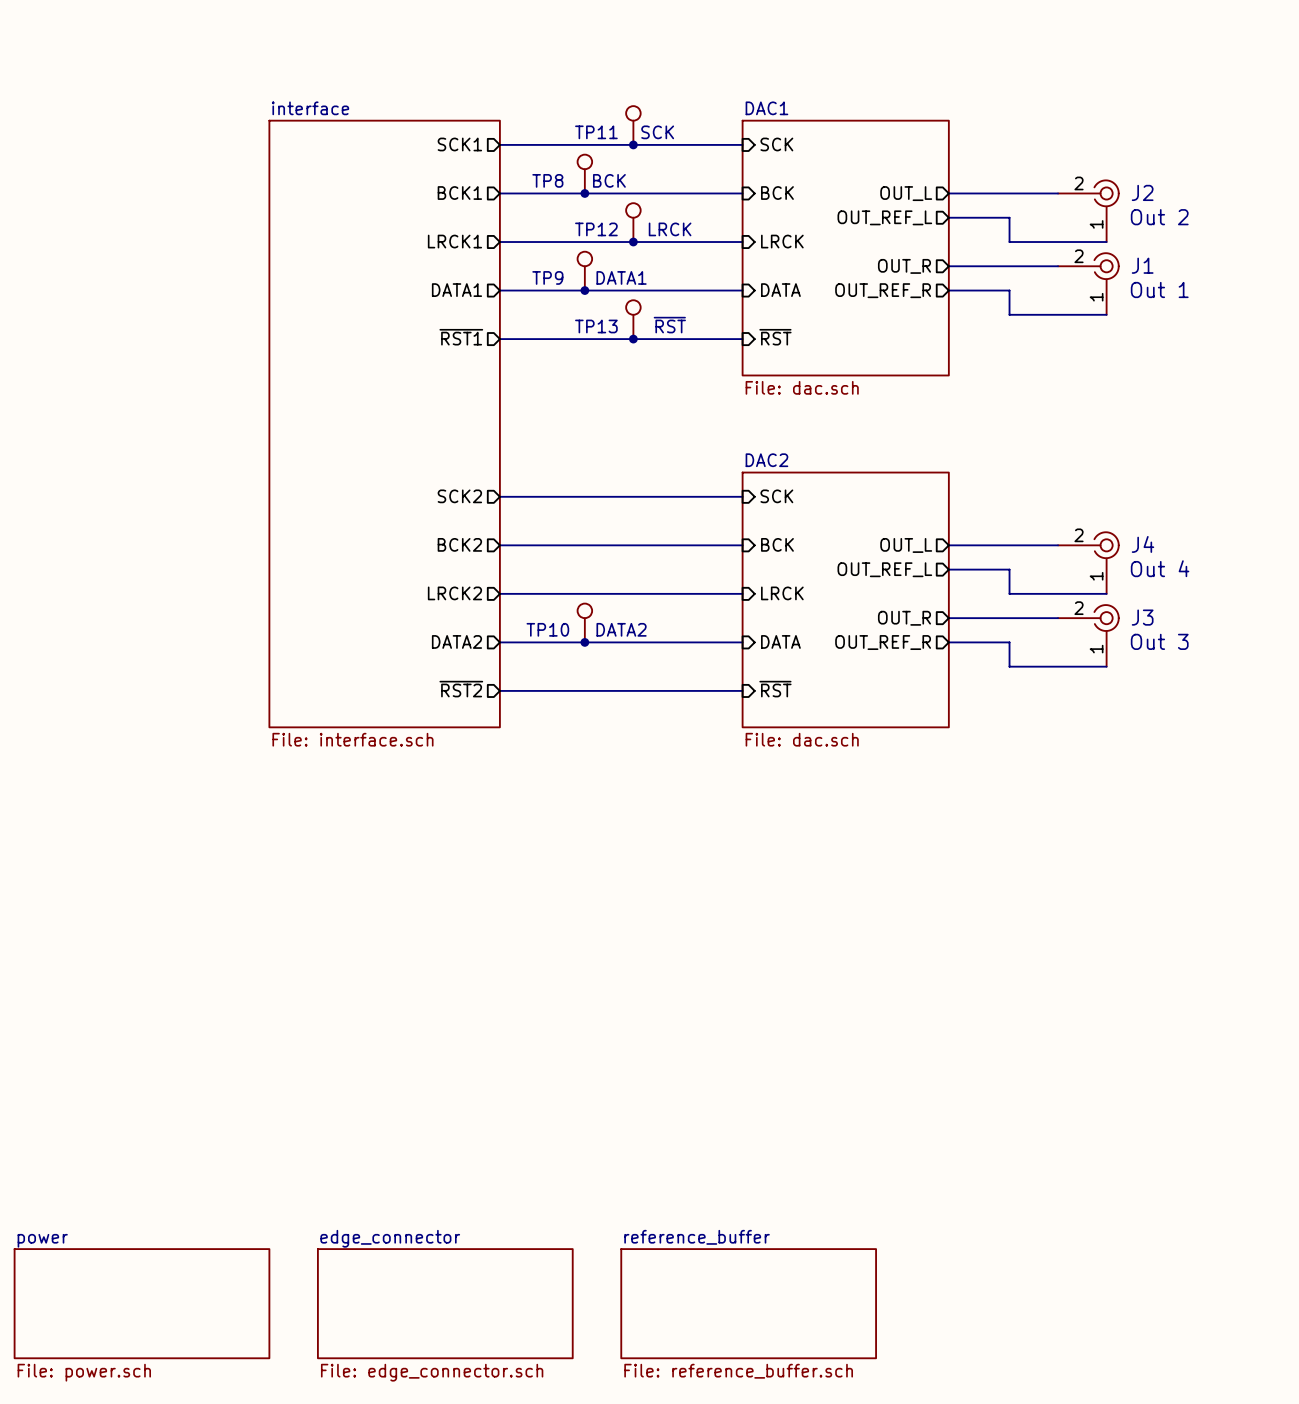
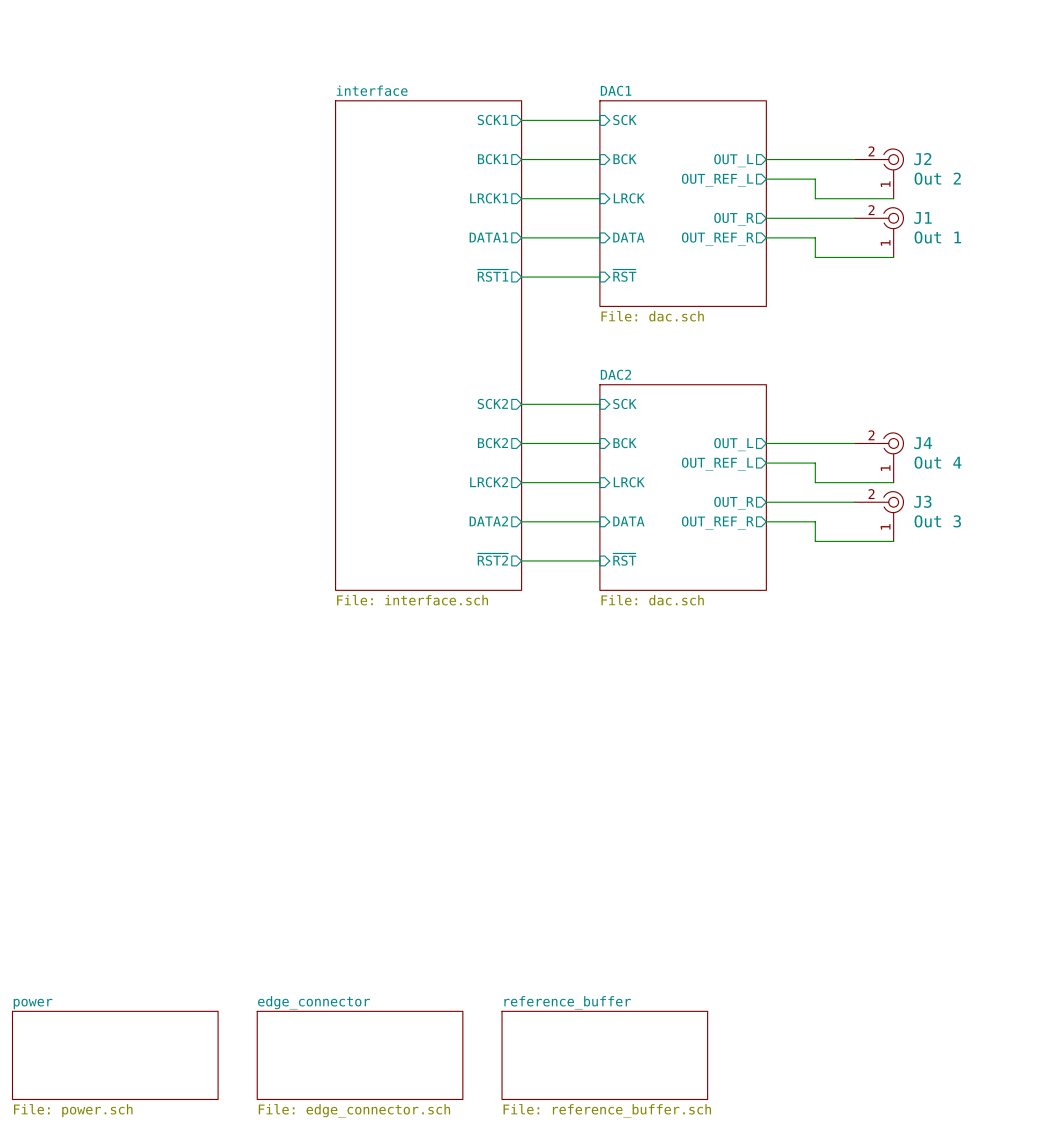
TP11: SCK (633, 125) -> none
sheet pin position: SCK1 (459, 144) -> SCK1 (492, 120)
wire: (499, 144) (645, 144) -> none
junction: (633, 144) -> none
TP8: BCK (584, 174) -> none
sheet pin position: BCK1 (459, 193) -> BCK1 (493, 159)
wire: (499, 193) (645, 193) -> none
junction: (584, 193) -> none
TP12: LRCK (633, 222) -> none
sheet pin position: LRCK1 (454, 241) -> LRCK1 (489, 198)
wire: (499, 242) (645, 242) -> none
junction: (633, 242) -> none
TP9: DATA1 (584, 271) -> none
sheet pin position: DATA1 (456, 290) -> DATA1 (488, 237)
wire: (499, 290) (645, 290) -> none
junction: (584, 290) -> none
TP13: ~{RST} (633, 319) -> none
sheet pin position: ~{RST1} (461, 337) -> ~{RST1} (493, 275)
wire: (499, 339) (645, 339) -> none
junction: (633, 339) -> none
sheet interface position: (384, 424) -> (428, 345)
sheet pin position: SCK2 (459, 496) -> SCK2 (492, 403)
wire: (499, 496) (645, 496) -> none
sheet pin position: BCK2 (459, 544) -> BCK2 (492, 443)
wire: (499, 545) (645, 545) -> none
sheet pin position: LRCK2 (454, 593) -> LRCK2 (489, 482)
wire: (499, 593) (645, 593) -> none
TP10: DATA2 (584, 622) -> none
sheet pin position: DATA2 (456, 641) -> DATA2 (488, 521)
wire: (499, 642) (645, 642) -> none
junction: (584, 642) -> none
sheet pin position: ~{RST2} (461, 689) -> ~{RST2} (492, 559)
wire: (499, 690) (645, 690) -> none

